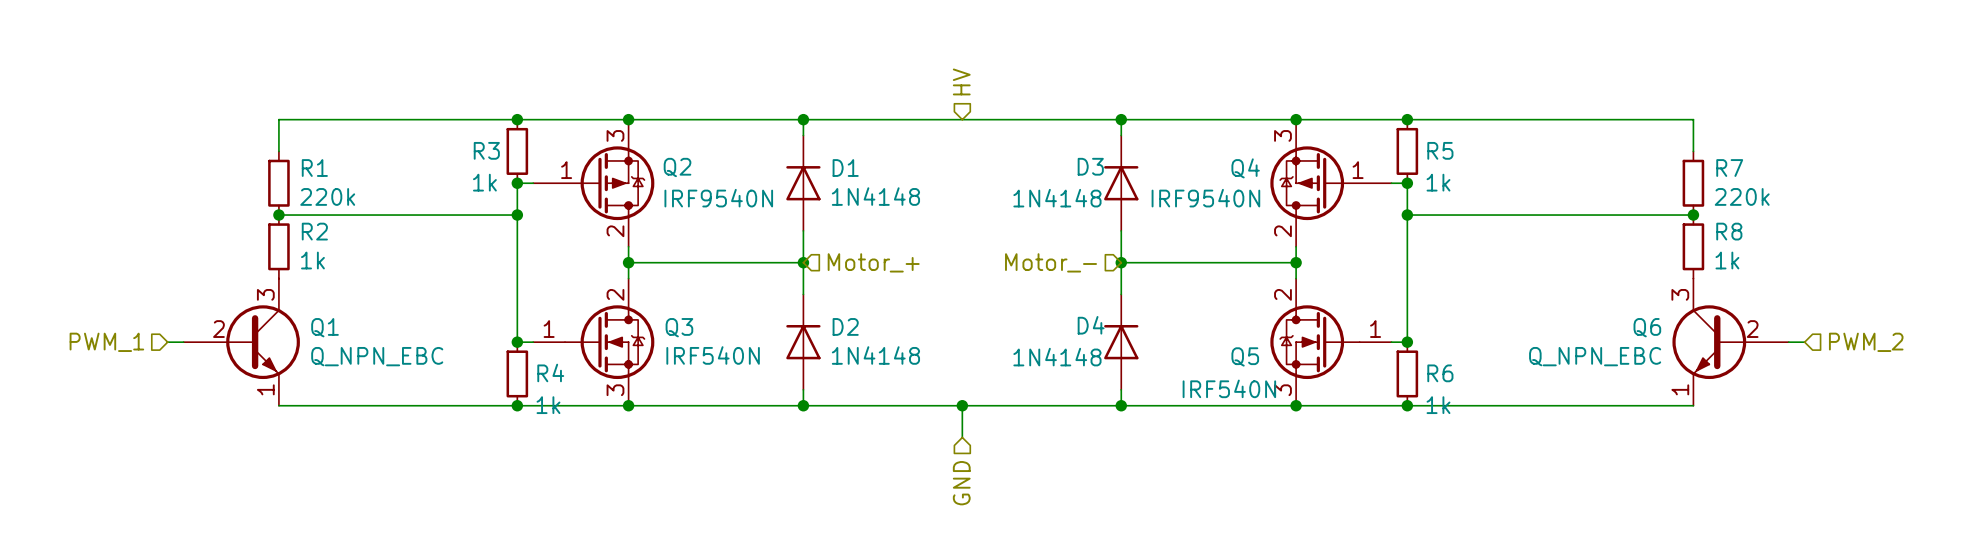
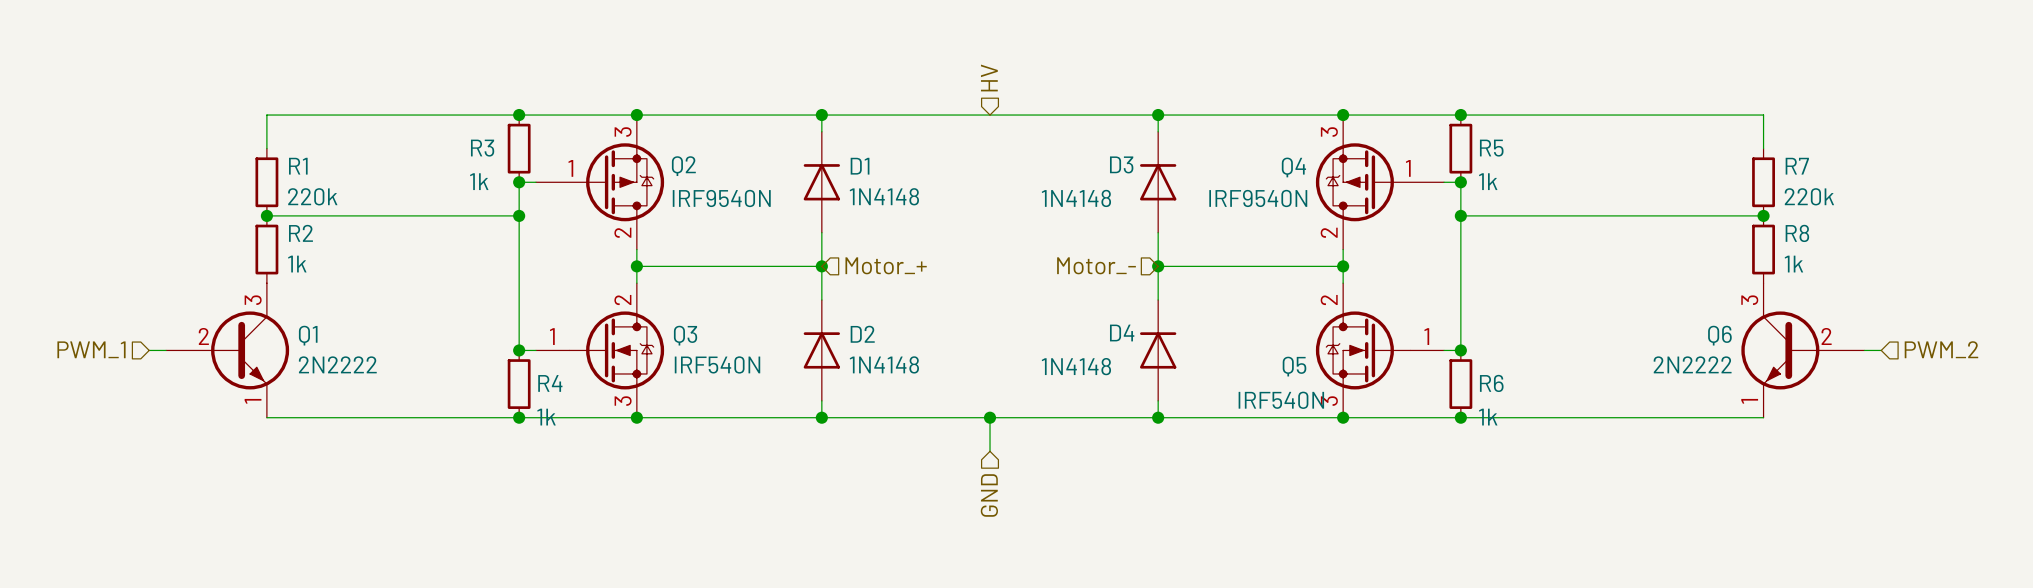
Q1 value: Q_NPN_EBC (377, 356) -> 2N2222 (337, 364)
Q6 value: Q_NPN_EBC (1595, 356) -> 2N2222 (1692, 364)

